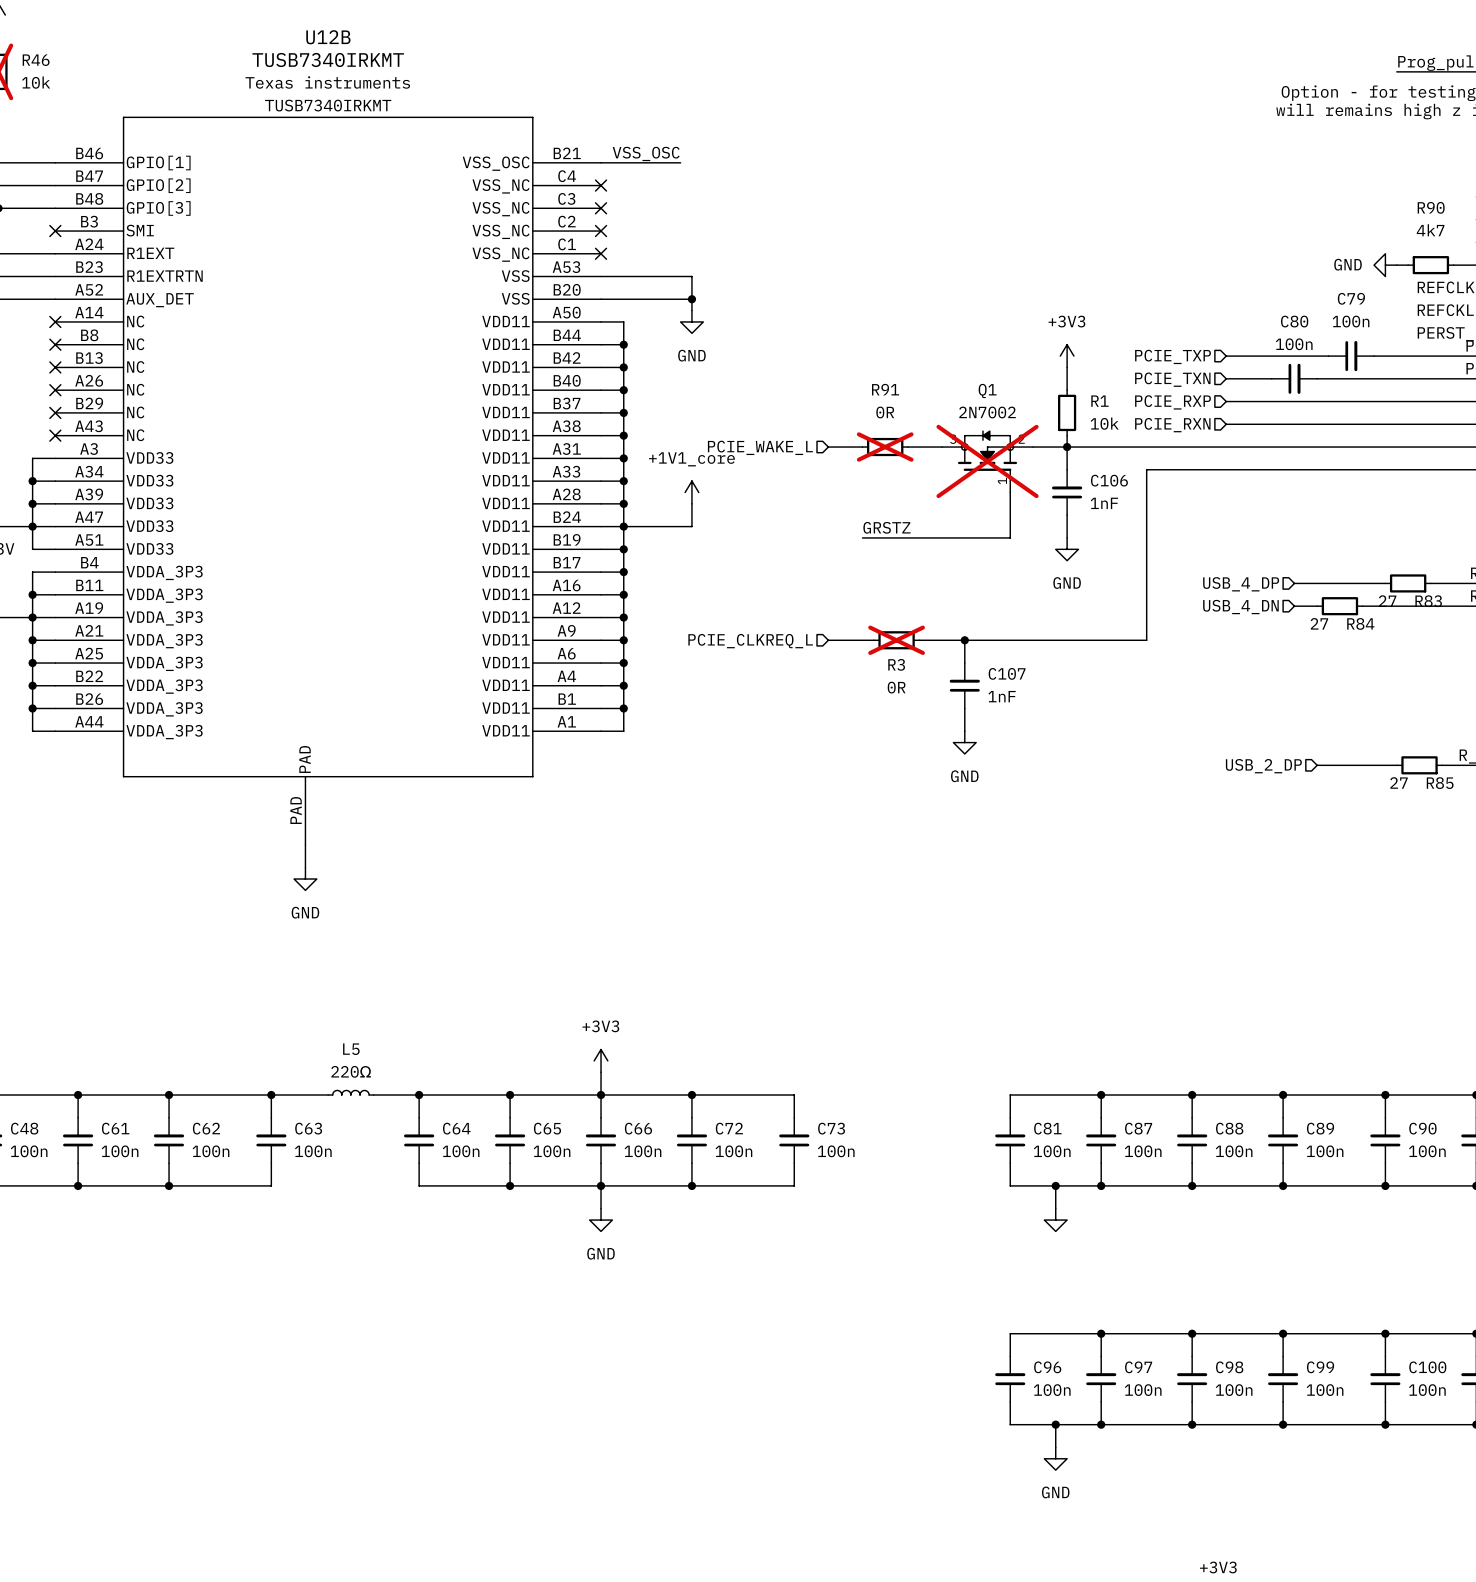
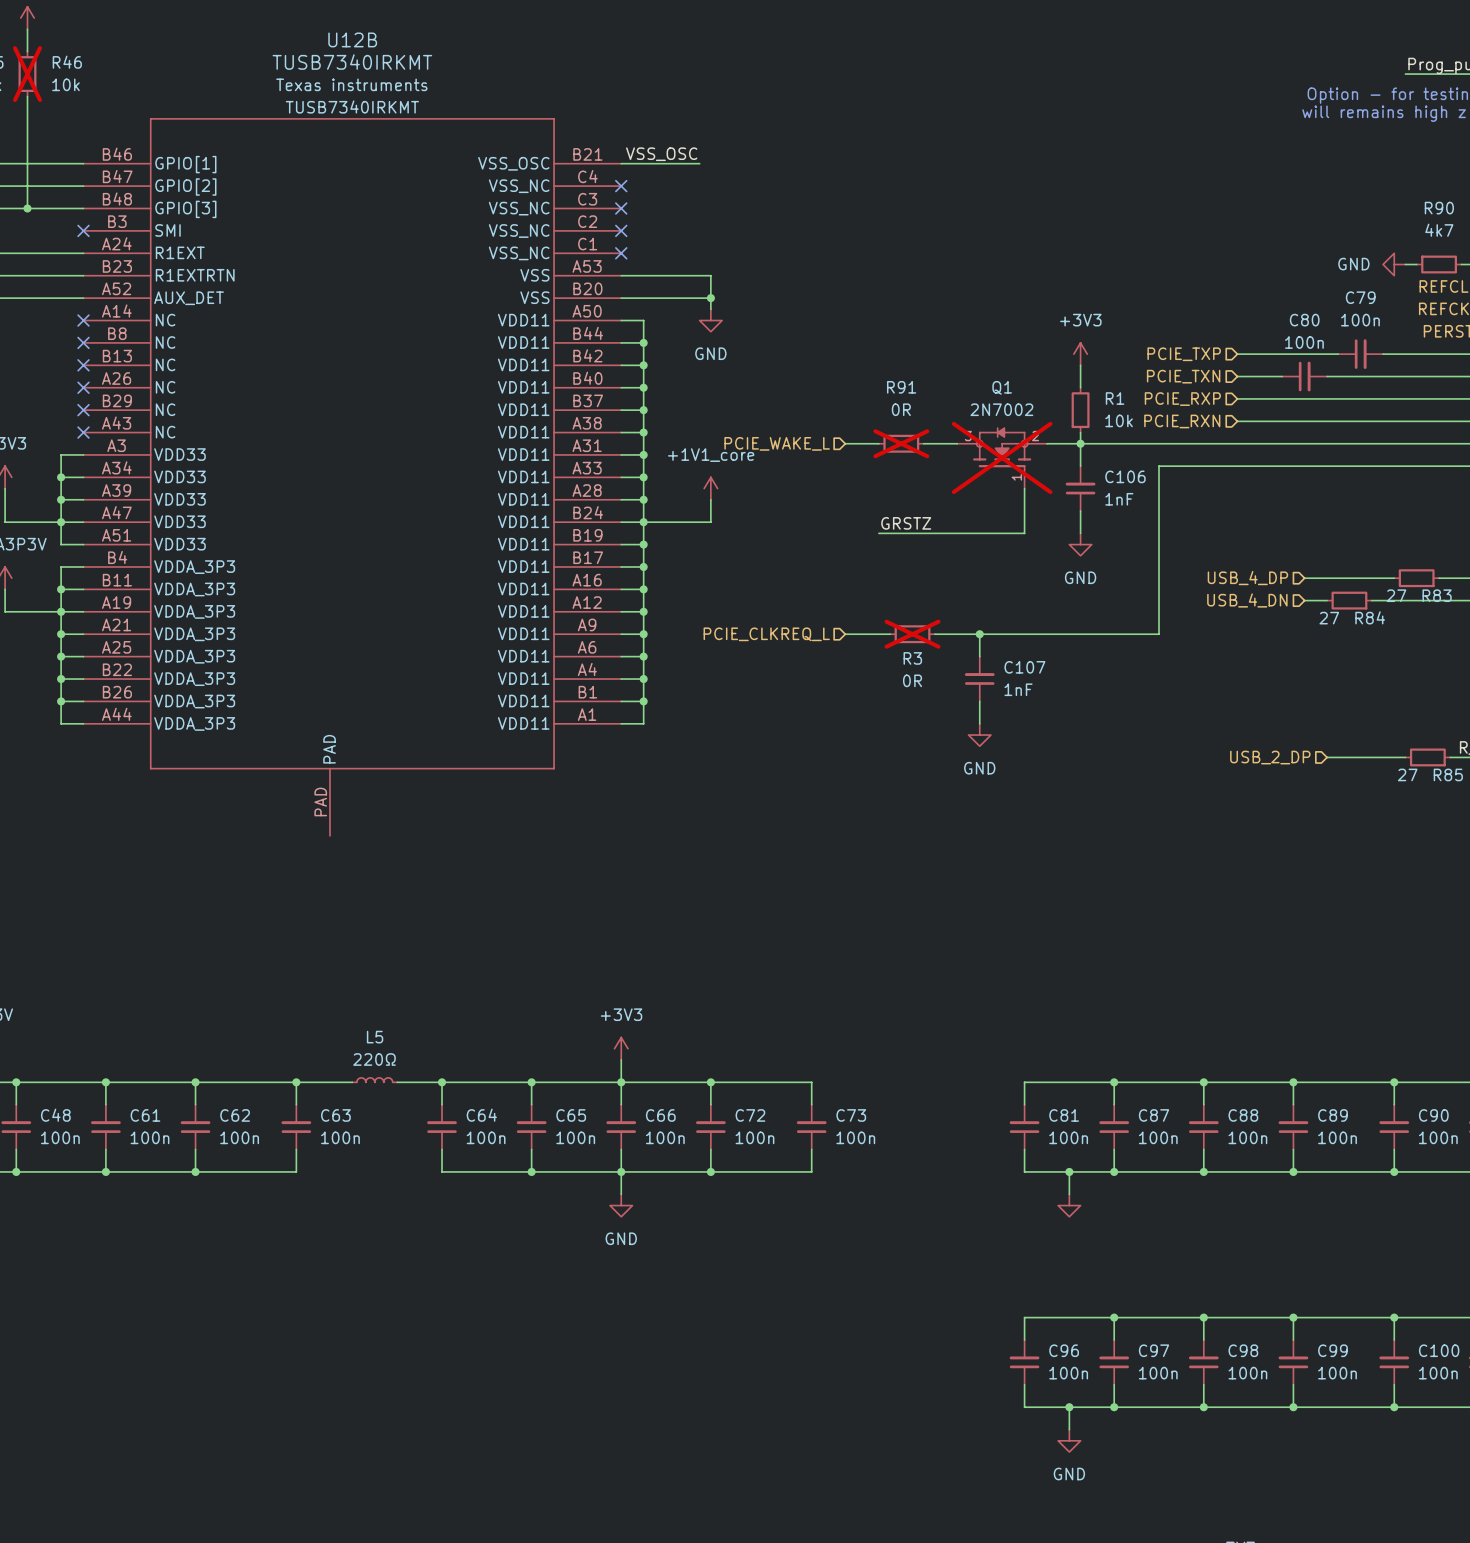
wire: (305, 844) (305, 867) -> none
power symbol: GND (305, 879) -> none

